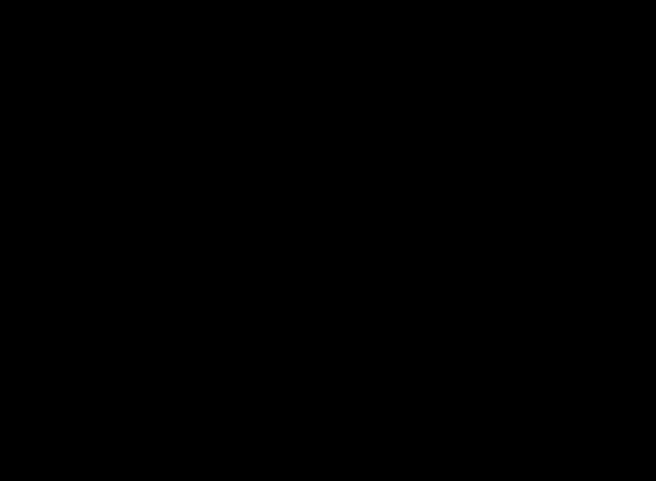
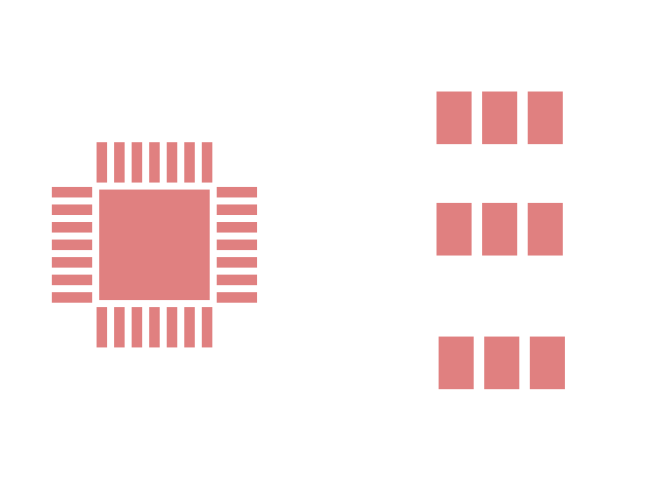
part: none -> (499, 117)
part: none -> (499, 229)
part: none -> (154, 244)
part: none -> (501, 362)

